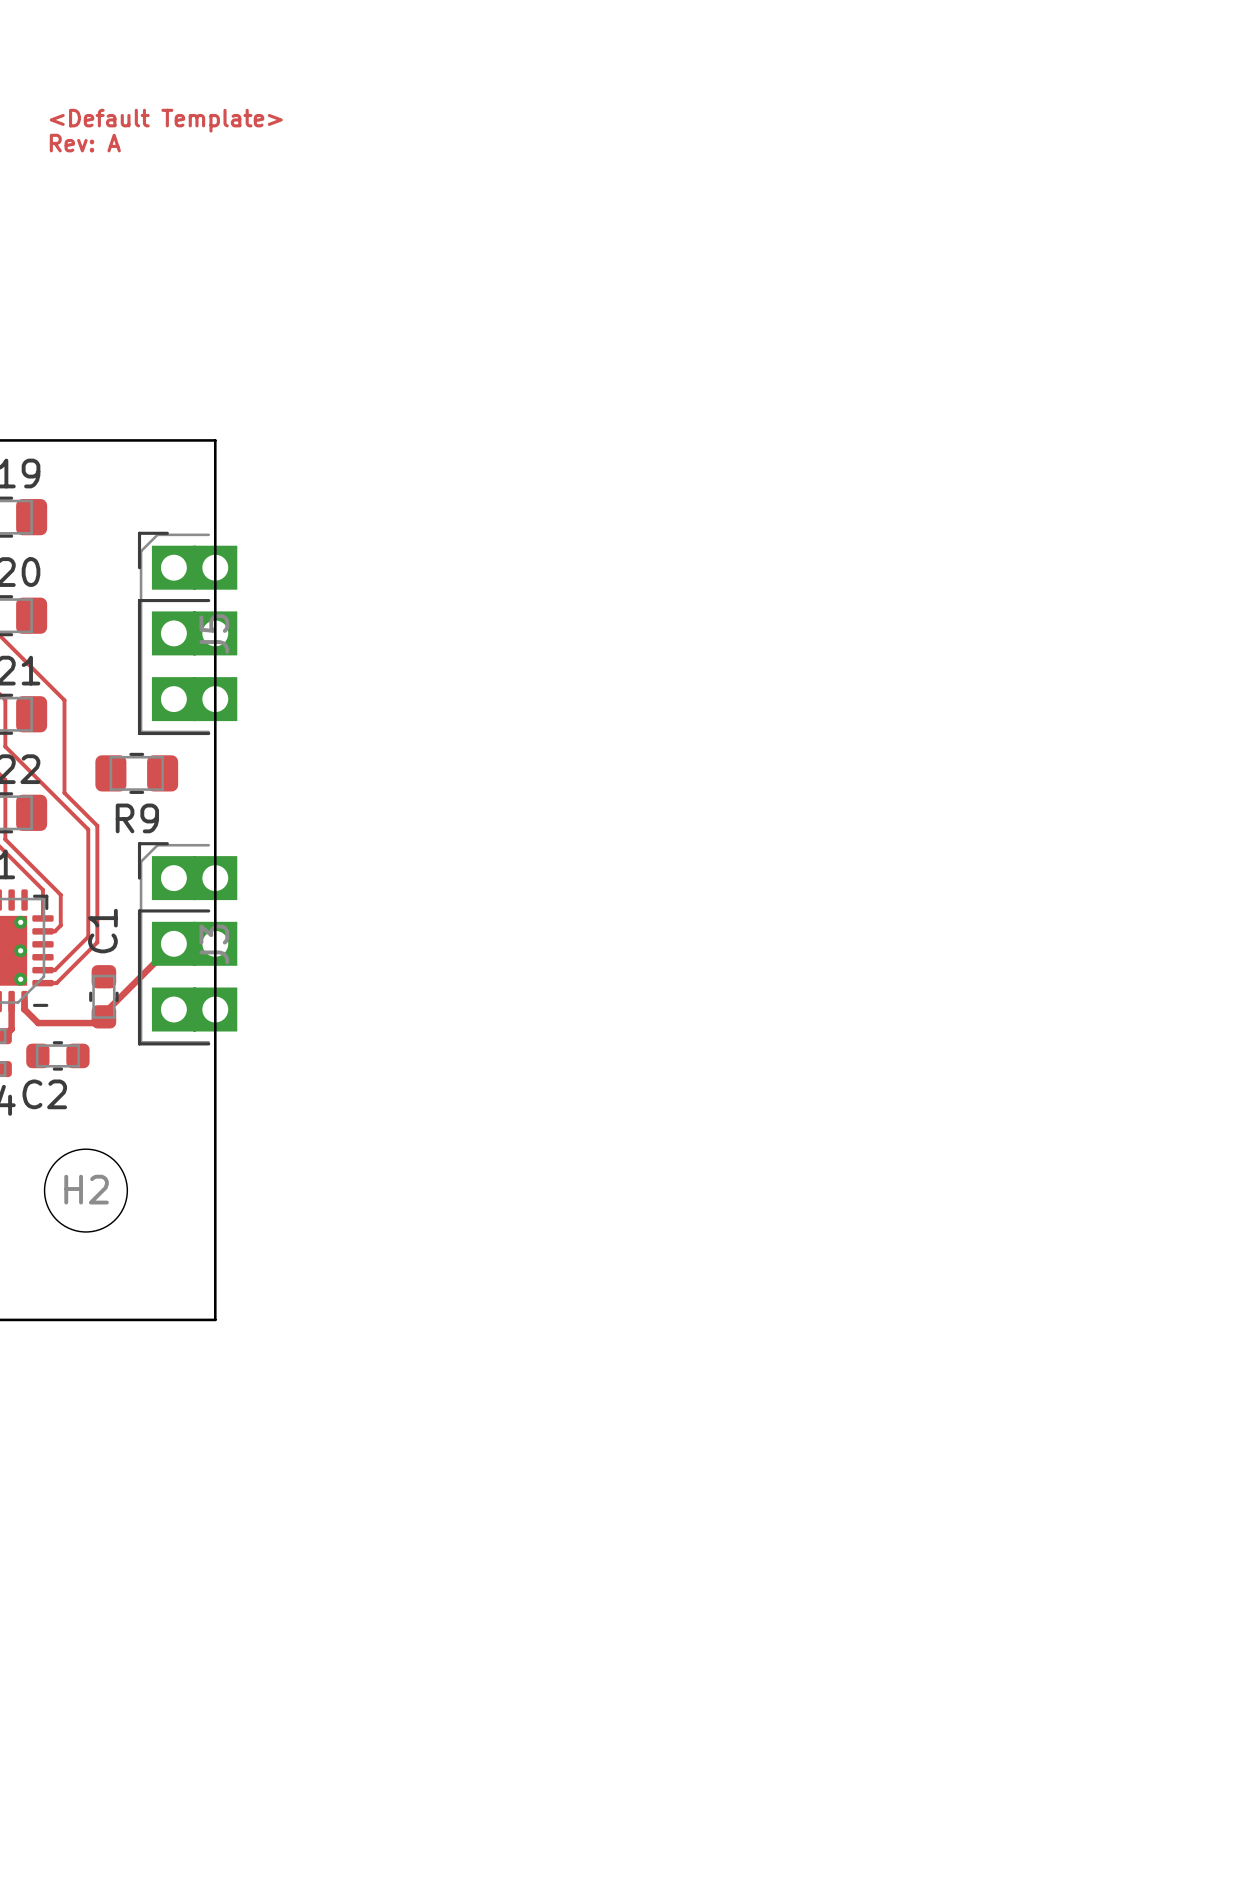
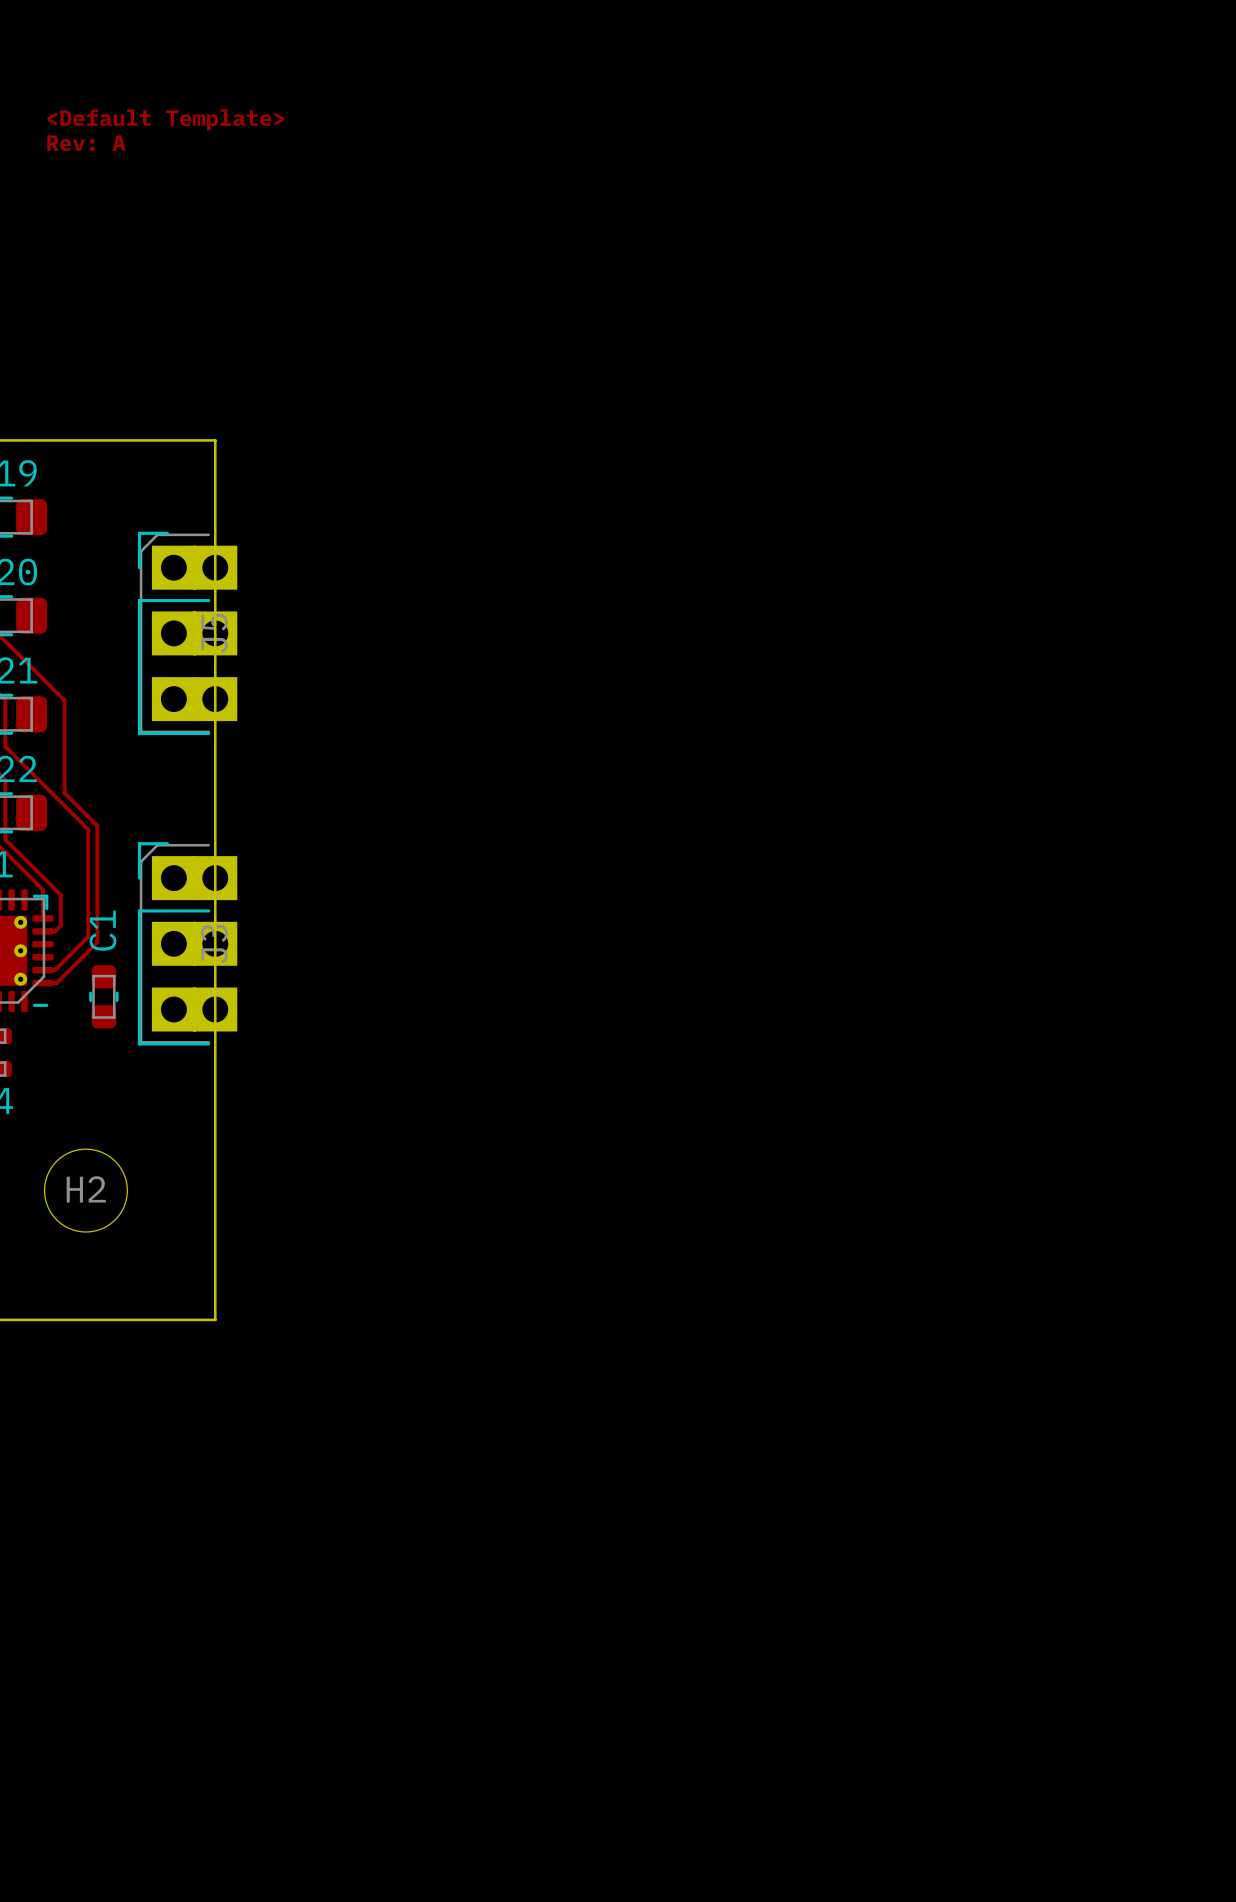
R9: (136, 773) -> none
track: (173, 943) (103, 1013) (103, 1016) (97, 1023) (38, 1023) (24, 1009) (24, 1001) -> none
track: (11, 1001) (11, 1029) (4, 1036) -> none
C2: (57, 1055) -> none

